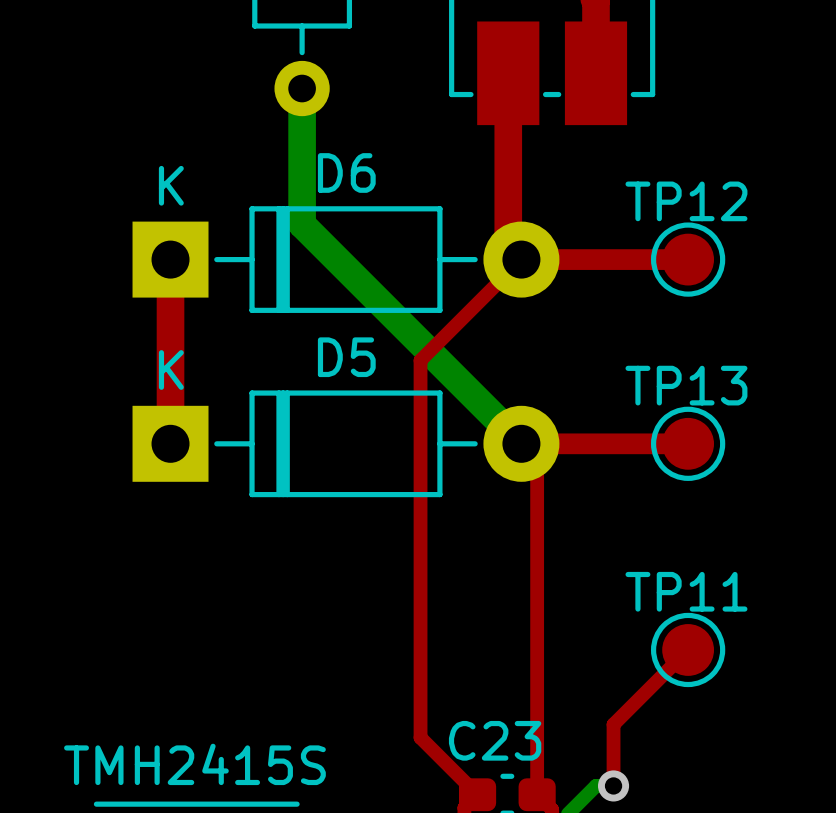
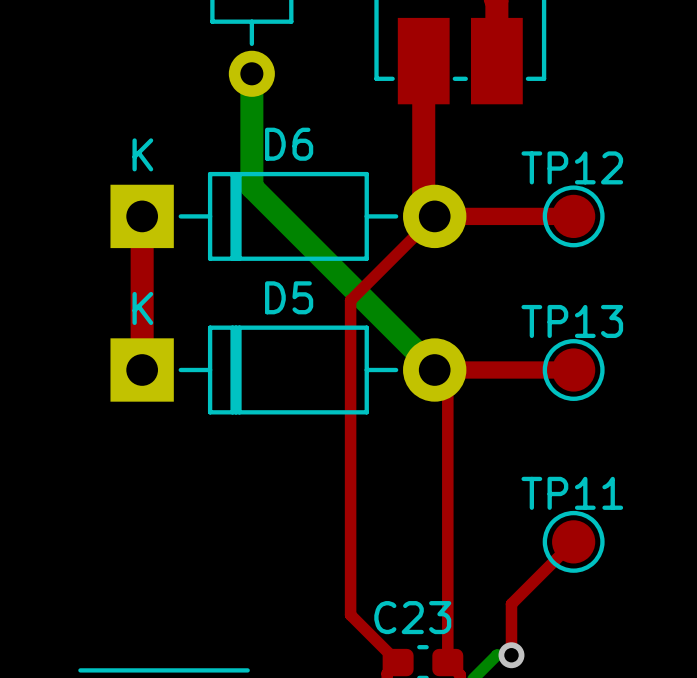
part value: TMH2415S (194, 764) -> none

